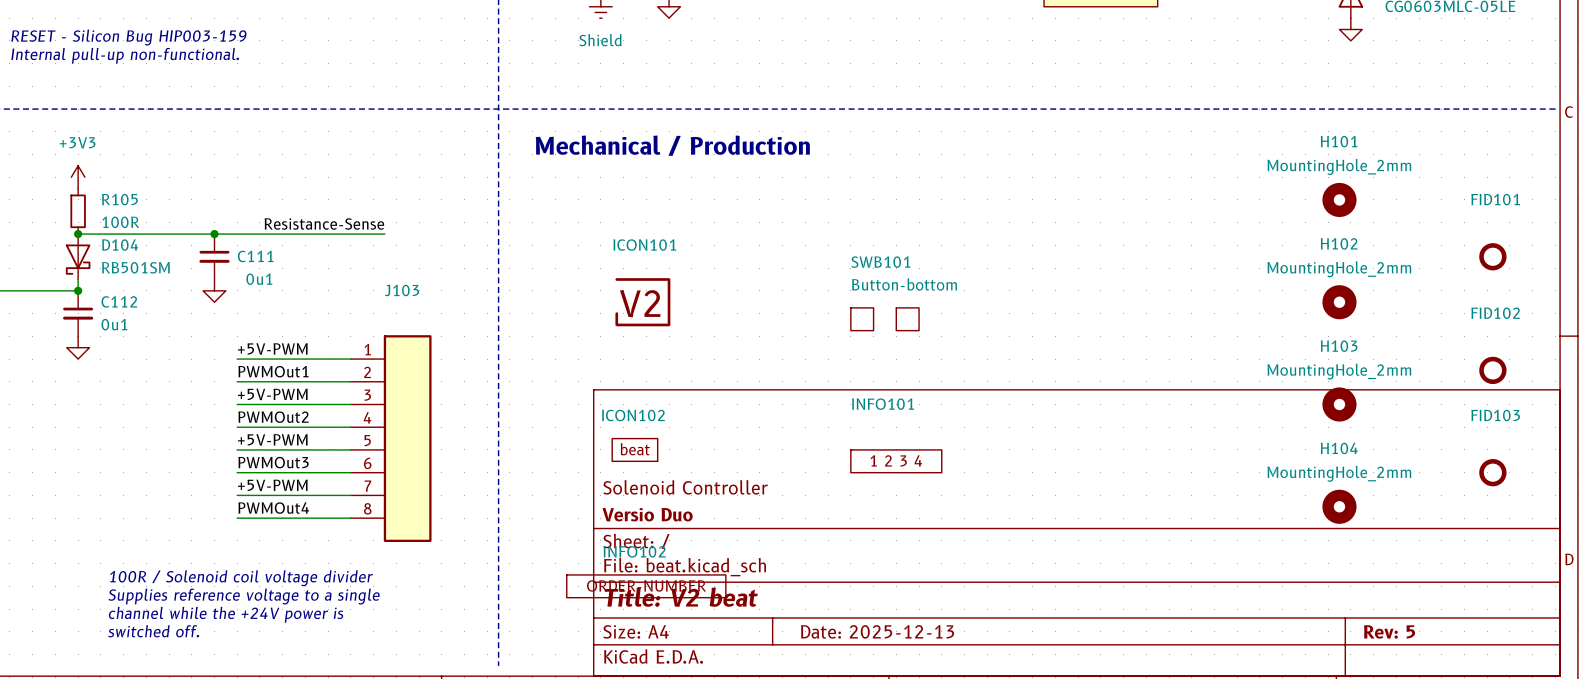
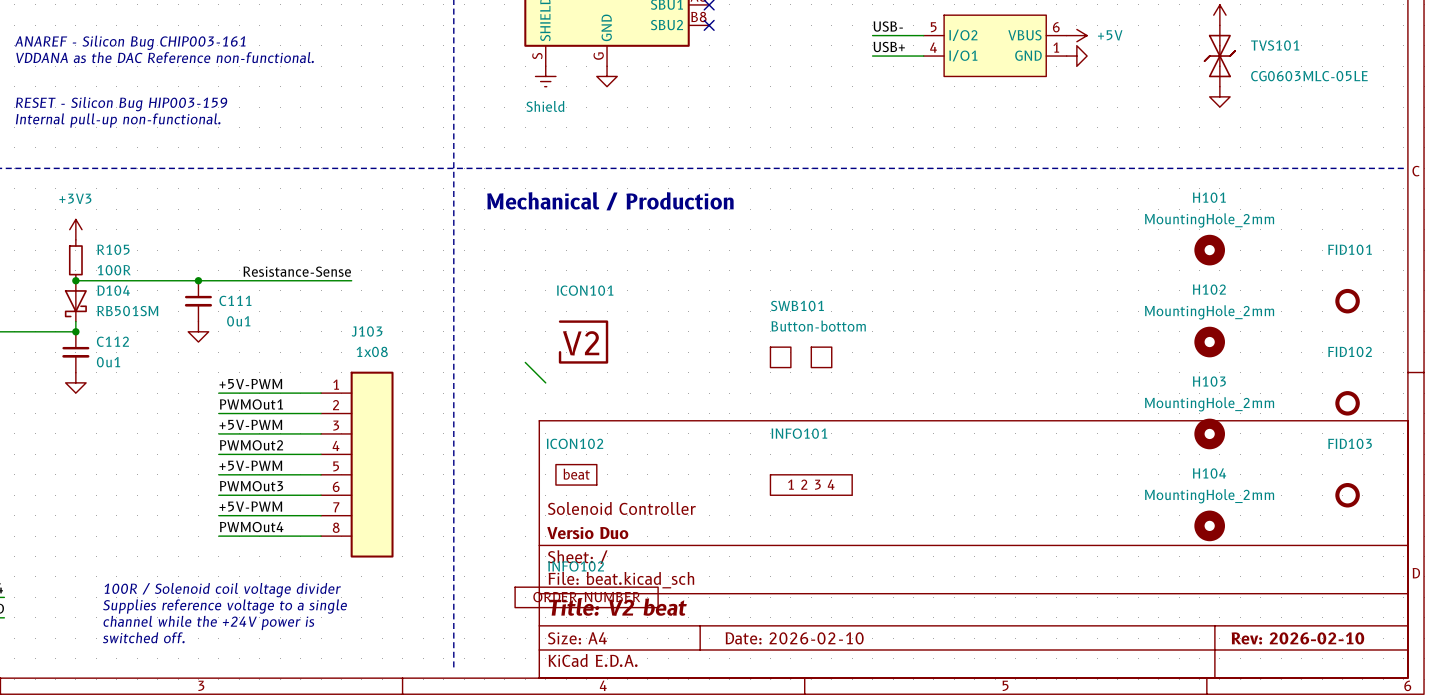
J103 value: none -> 1x08 (372, 351)
wire: none -> (525, 362) (545, 382)
title block: Date: 2025-12-13 (877, 631) -> Date: 2026-02-10 (794, 638)
title block: Rev: 5 (1389, 631) -> Rev: 2026-02-10 (1297, 638)

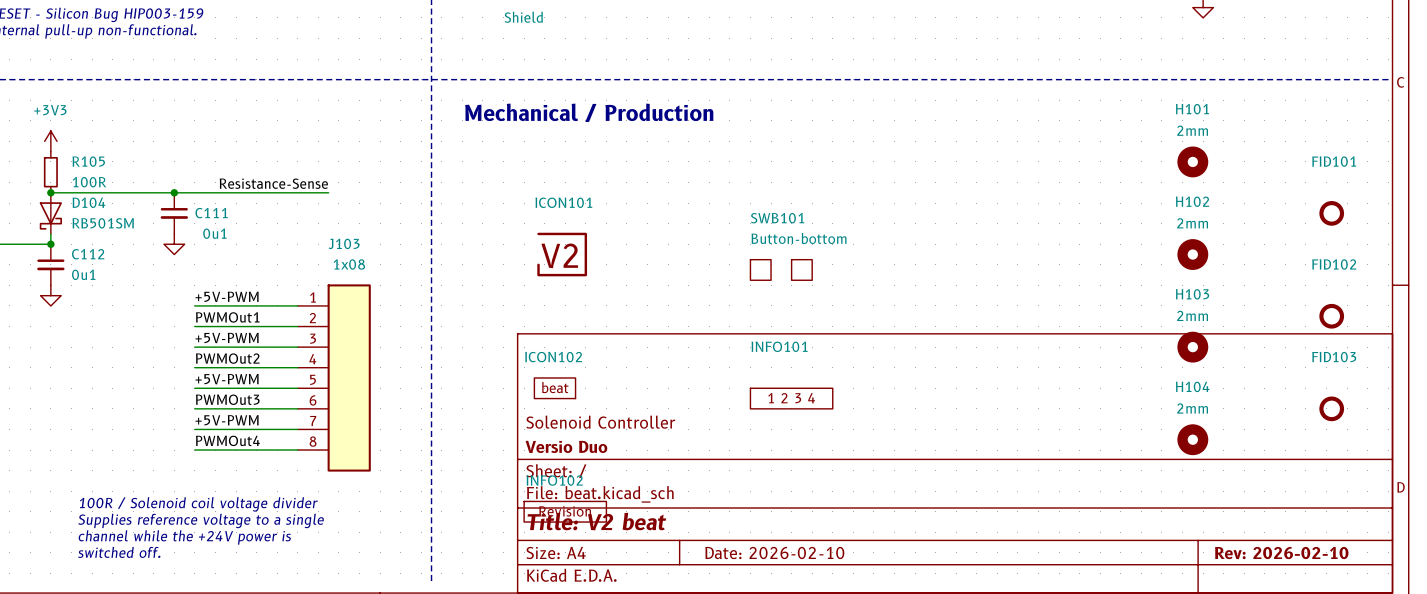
H101 value: MountingHole_2mm (1209, 220) -> 2mm (1192, 130)
H102 value: MountingHole_2mm (1209, 312) -> 2mm (1192, 223)
wire: (525, 362) (545, 382) -> none
H103 value: MountingHole_2mm (1209, 404) -> 2mm (1192, 315)
H104 value: MountingHole_2mm (1209, 496) -> 2mm (1192, 408)
INFO102 symbol: [515, 587, 659, 608] -> [524, 501, 607, 523]

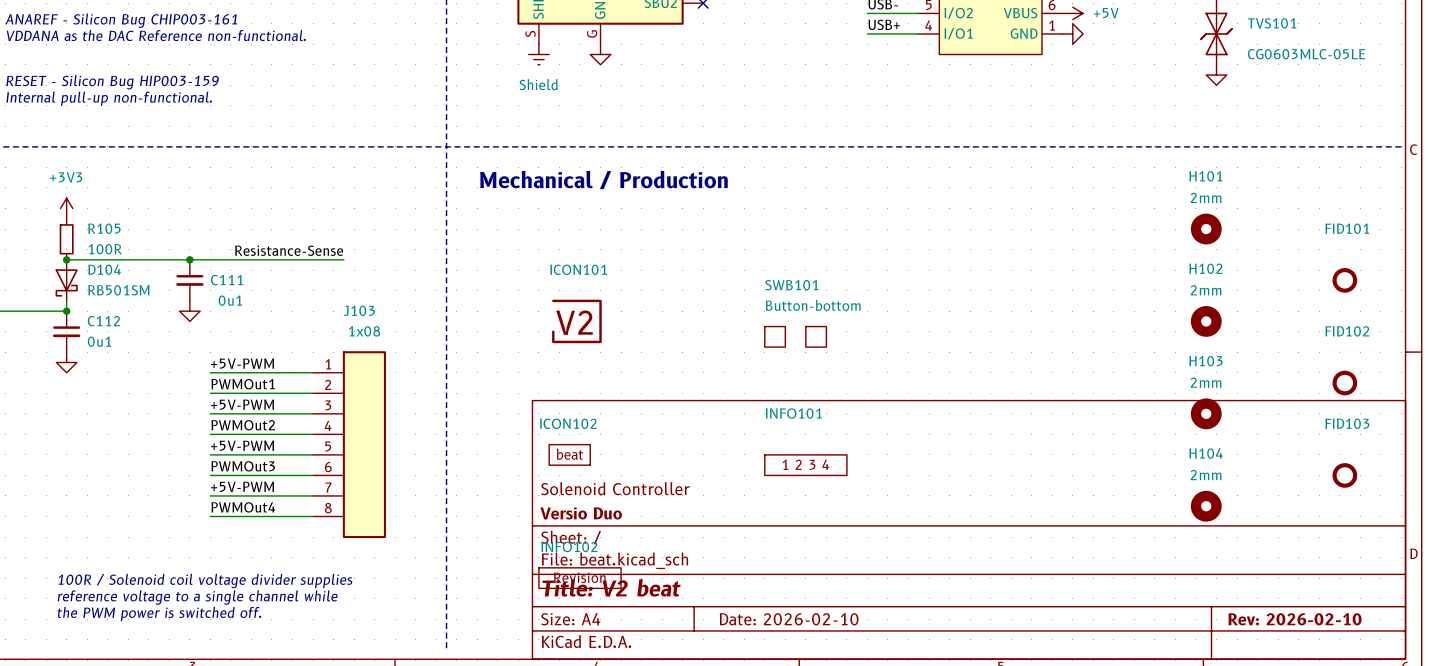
text: 100R / Solenoid coil voltage divider (198, 504) -> 100R / Solenoid coil voltage divider supplies (205, 581)
text: Supplies reference voltage to a single (201, 520) -> reference voltage to a single channel while (197, 597)
text: channel while the +24V power is (184, 537) -> none
text: switched off. (119, 552) -> the PWM power is switched off. (159, 614)

